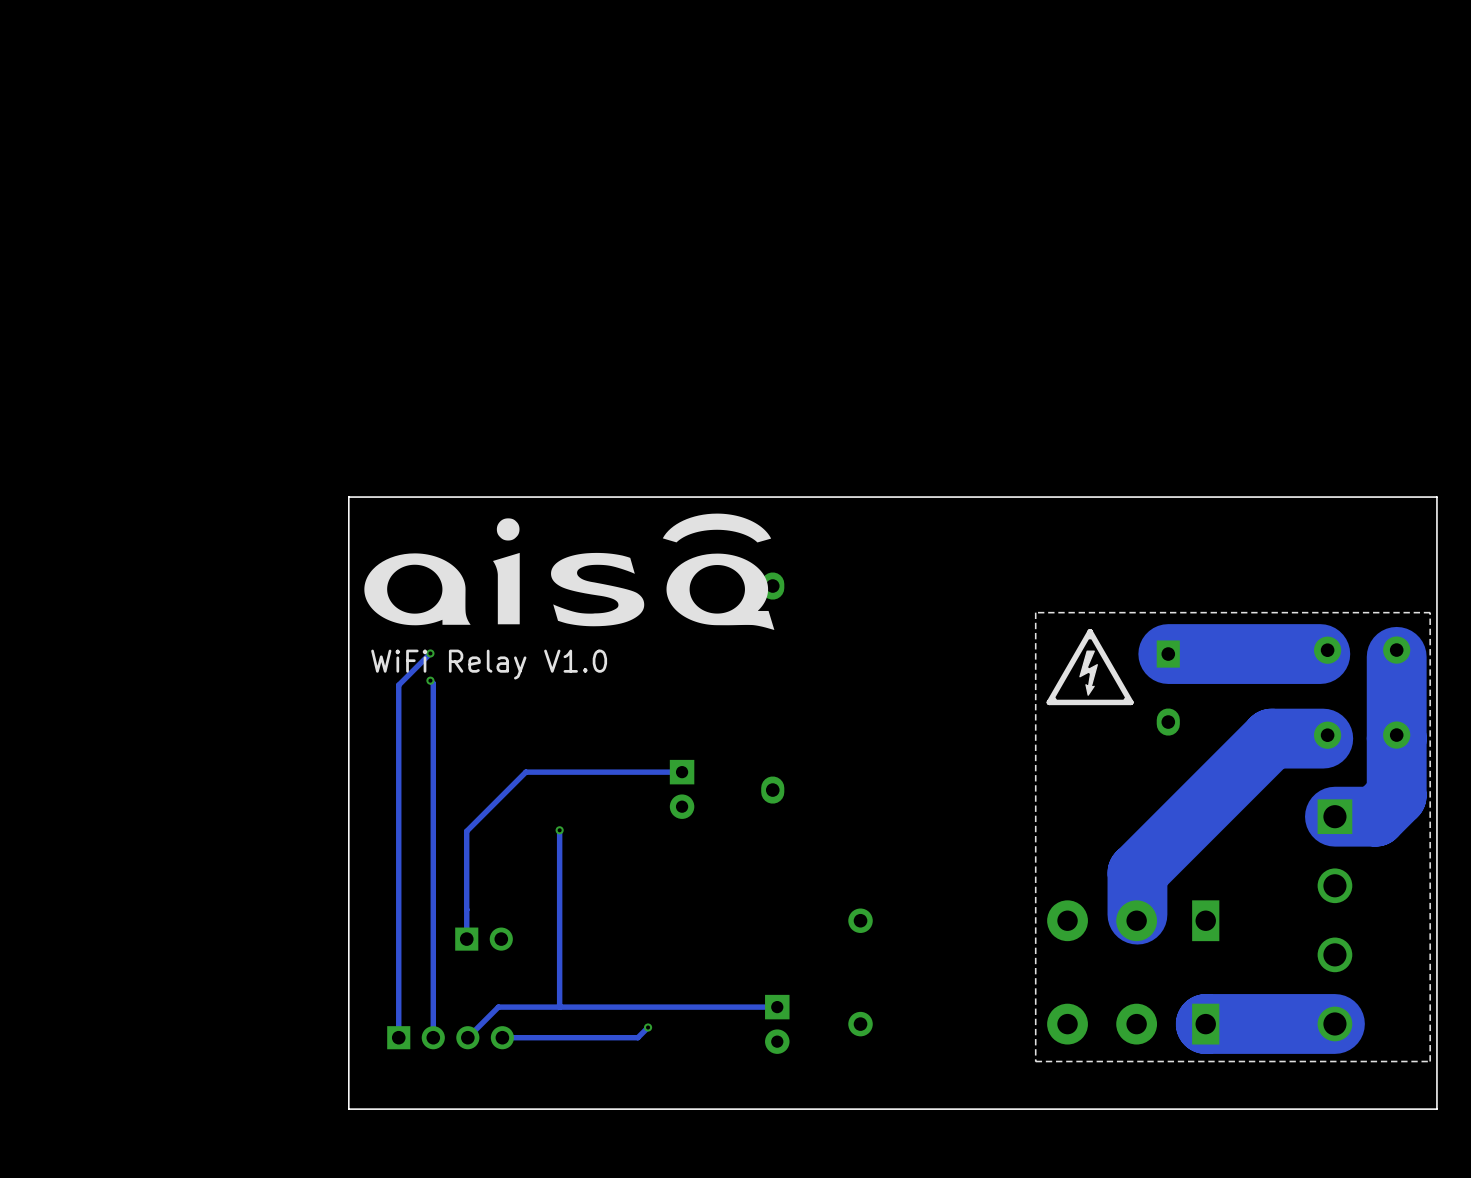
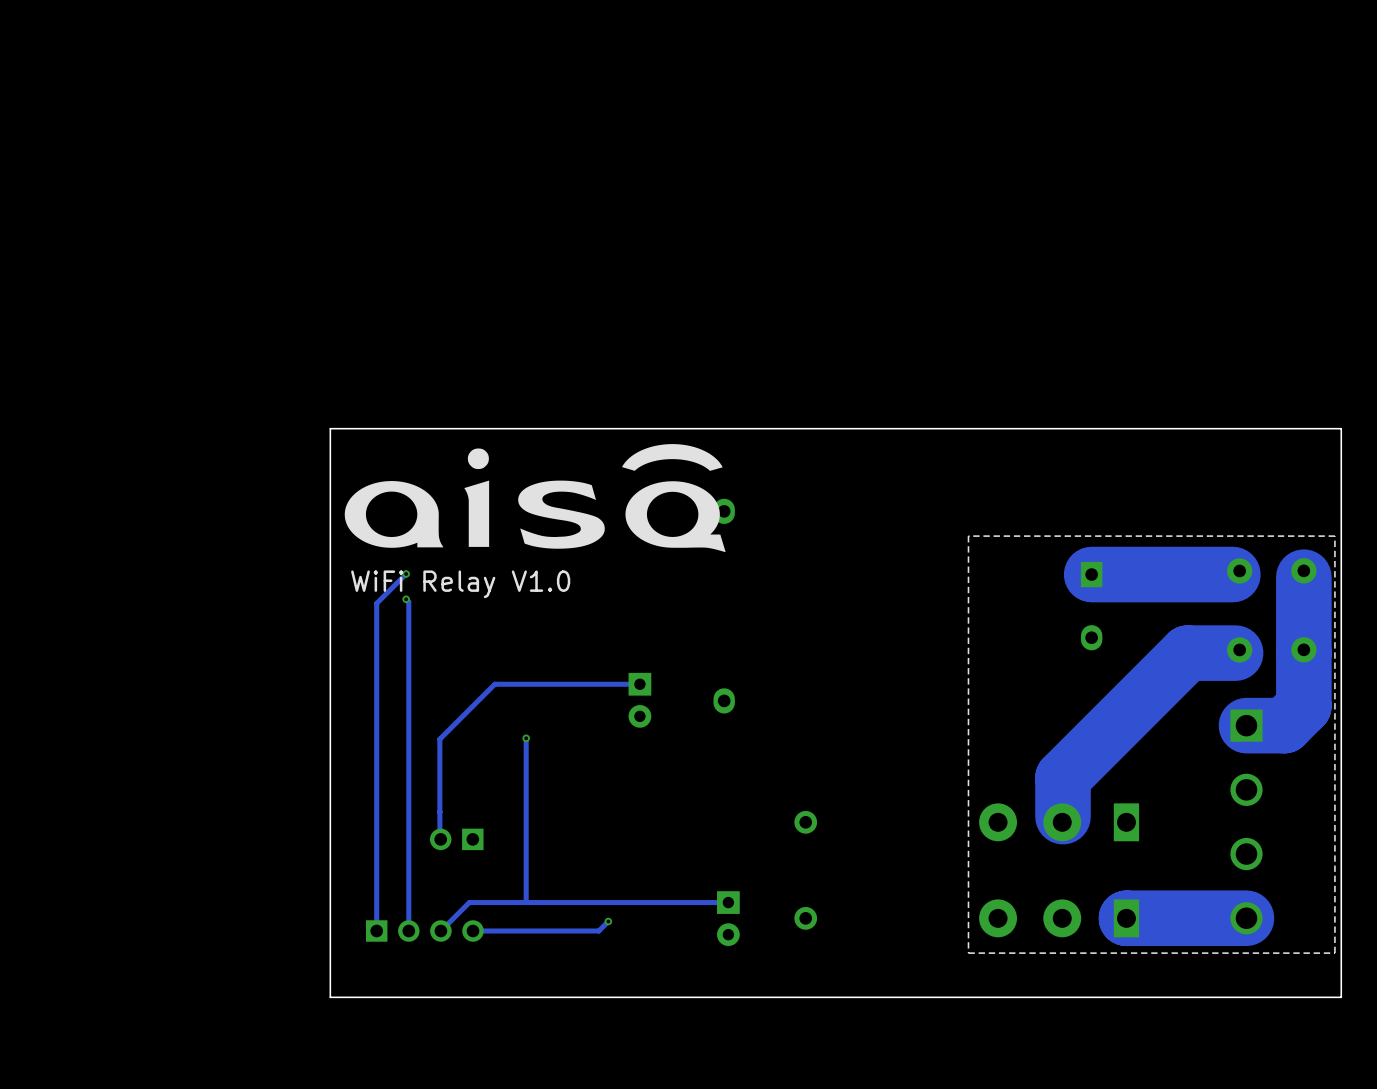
drawing: [1046, 628, 1134, 706] -> none
part rotation: 0° (484, 939) -> 180° (456, 839)

